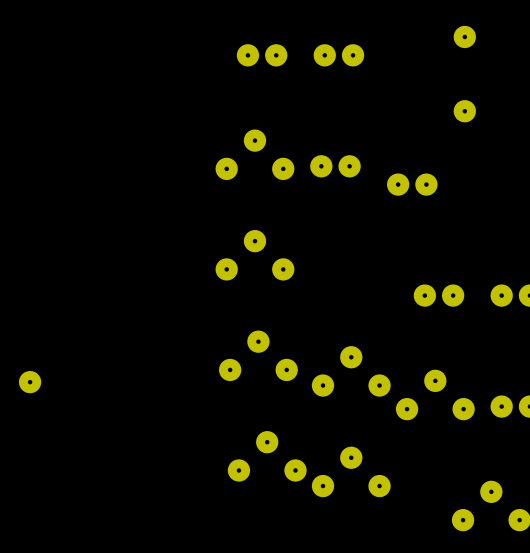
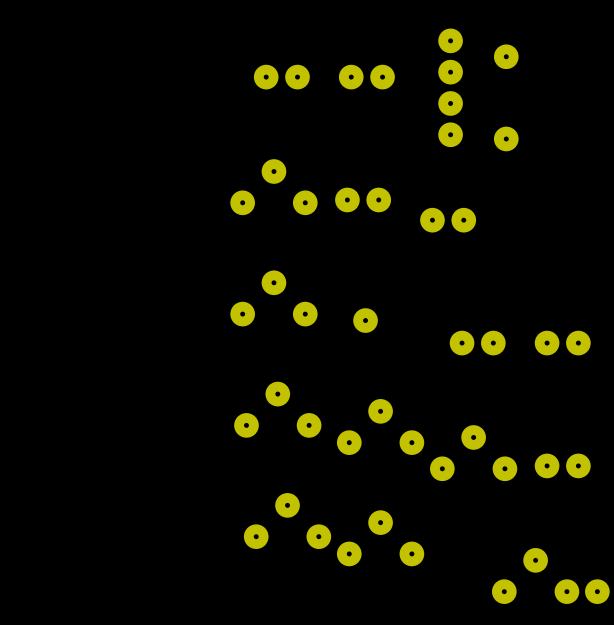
part: none -> (450, 87)
part: none -> (365, 320)
part: (30, 382) -> none

